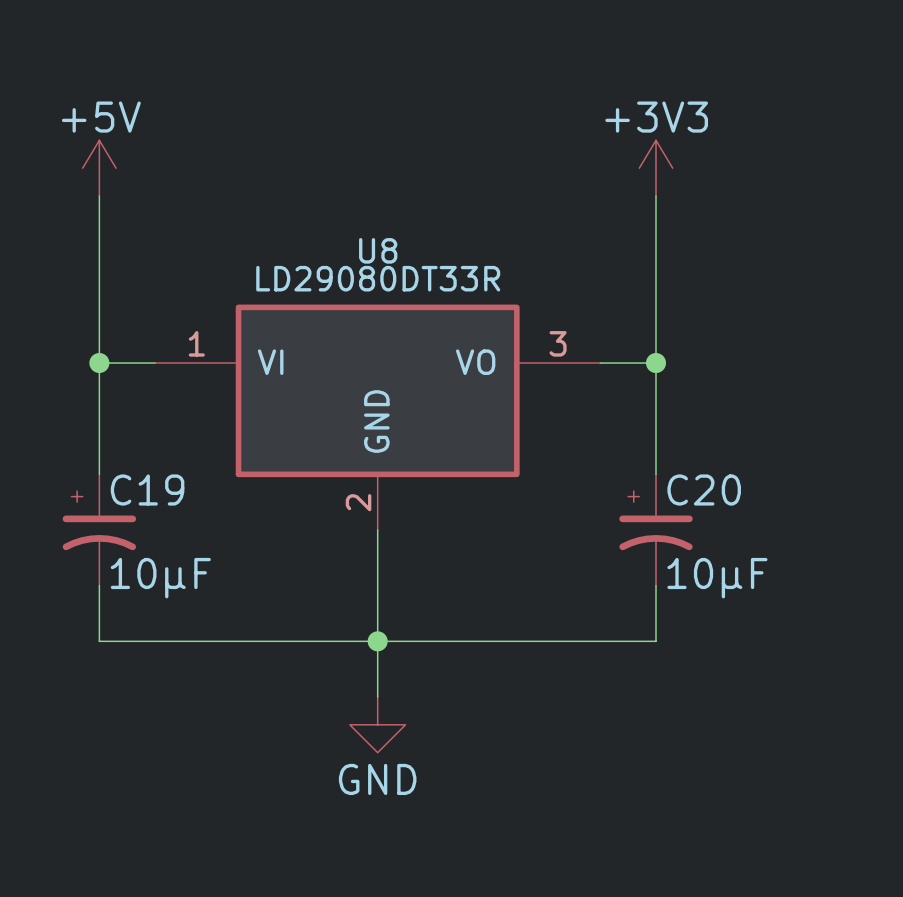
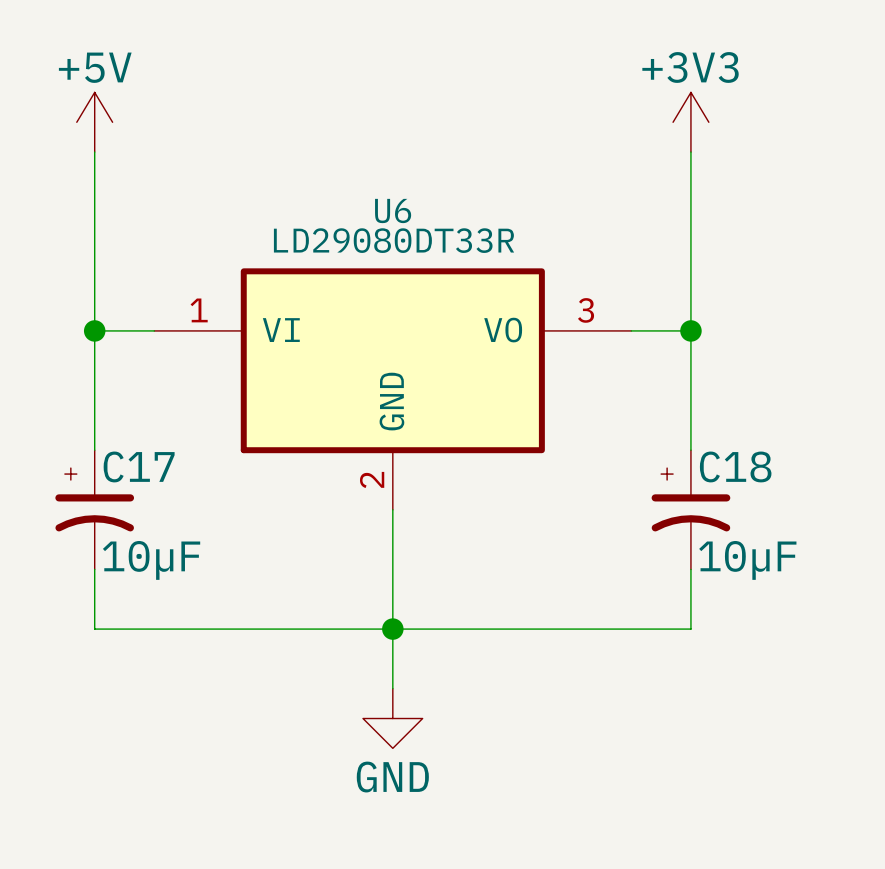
U8 name: U8 (378, 250) -> U6 (393, 211)
C19 name: C19 (147, 490) -> C17 (139, 466)
C20 name: C20 (704, 490) -> C18 (735, 466)

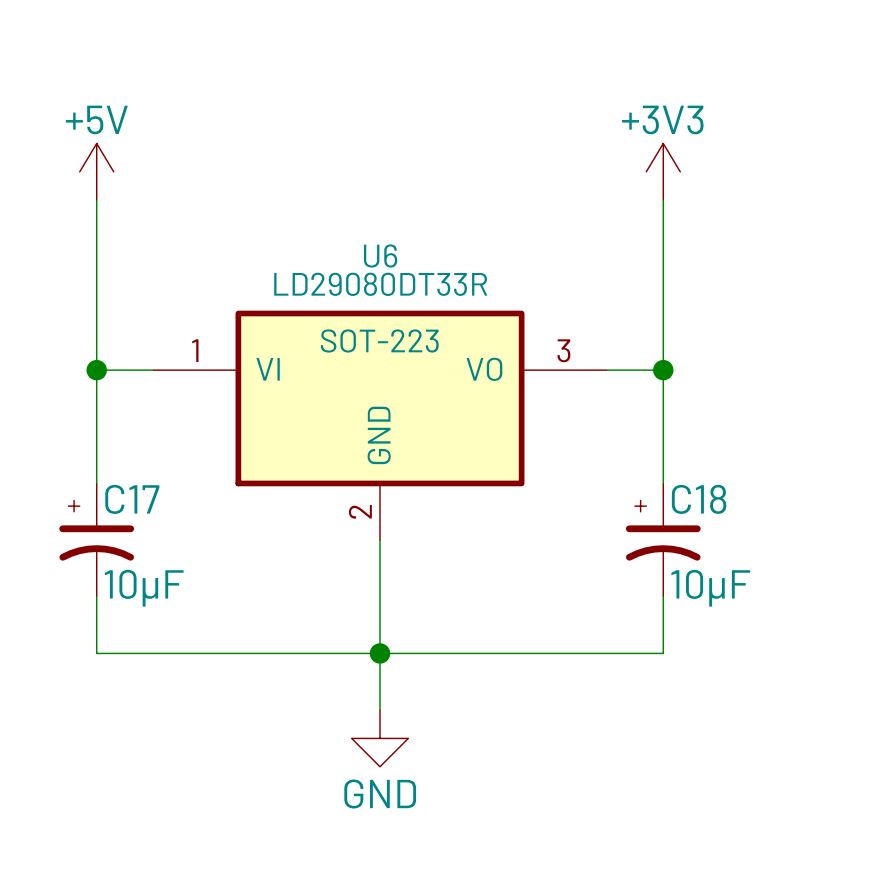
U6 text: none -> SOT-223 (379, 340)

